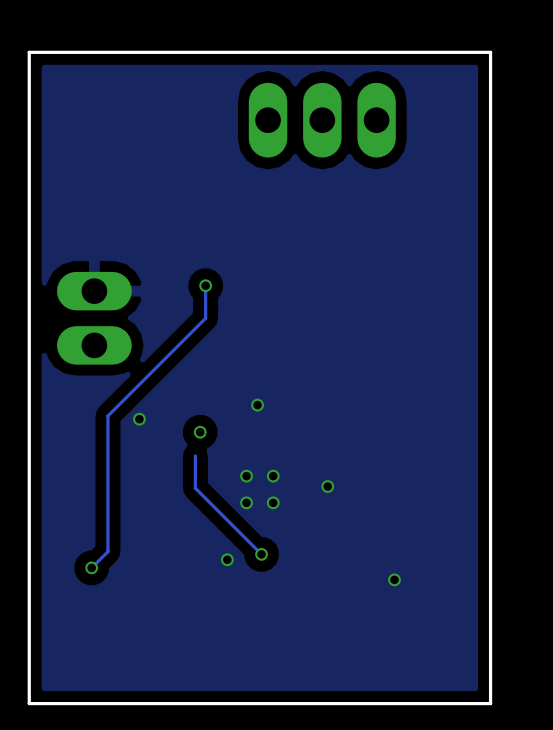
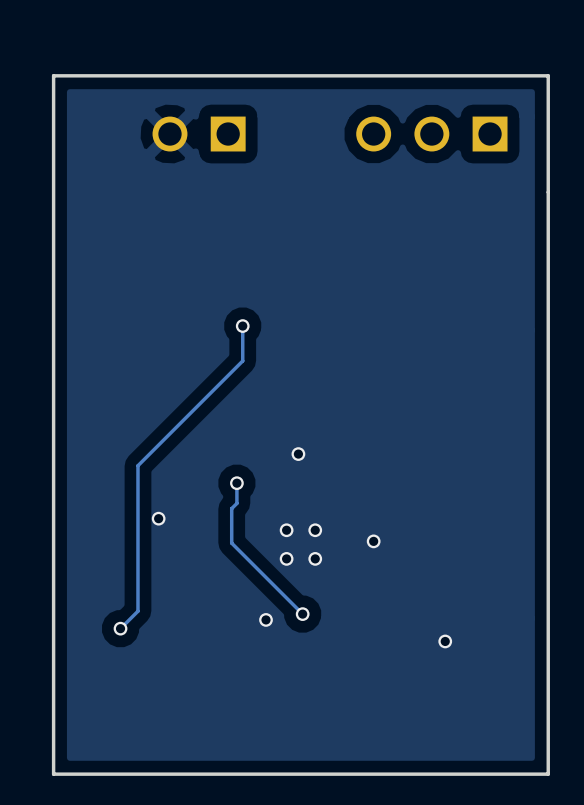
part: none -> (199, 134)
part: none -> (431, 134)
part: (322, 120) -> none
part: (94, 318) -> none
via position: (139, 419) -> (158, 518)
track: none -> (236, 483) (236, 503) (231, 508)

